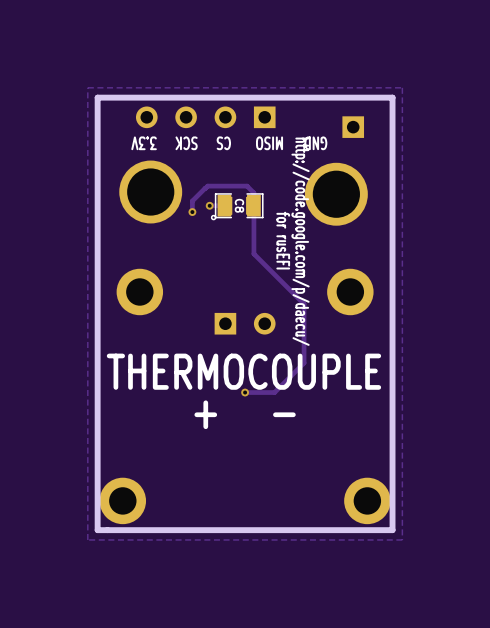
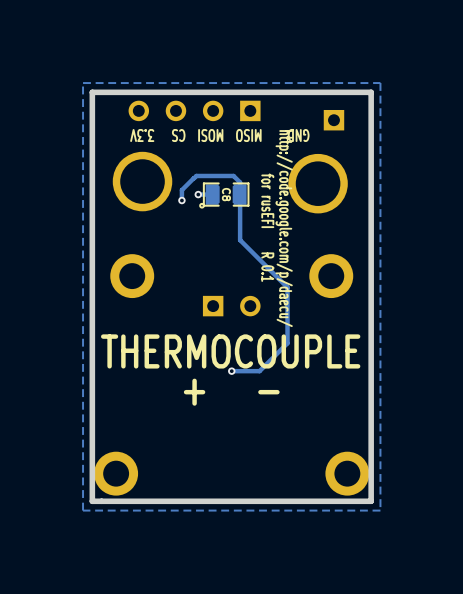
text: MISO CS SCK 3.3V (207, 143) -> MISO MOSI CS 3.3V (195, 135)
text: for rusEFI (283, 240) -> for rusEFI R 0.1 (267, 227)

